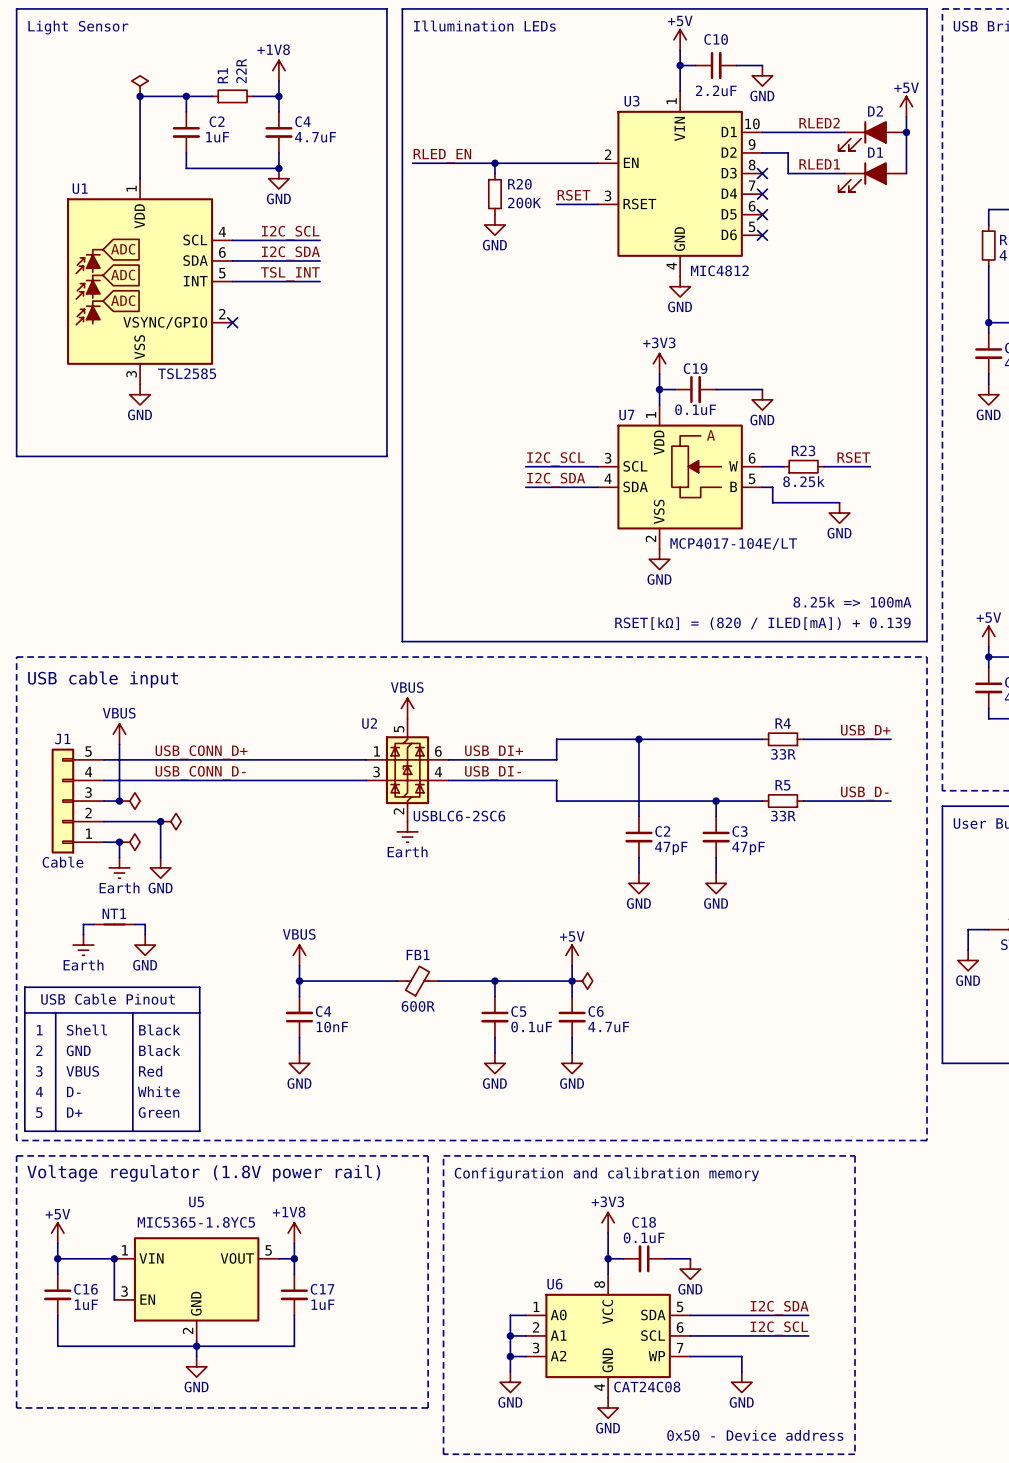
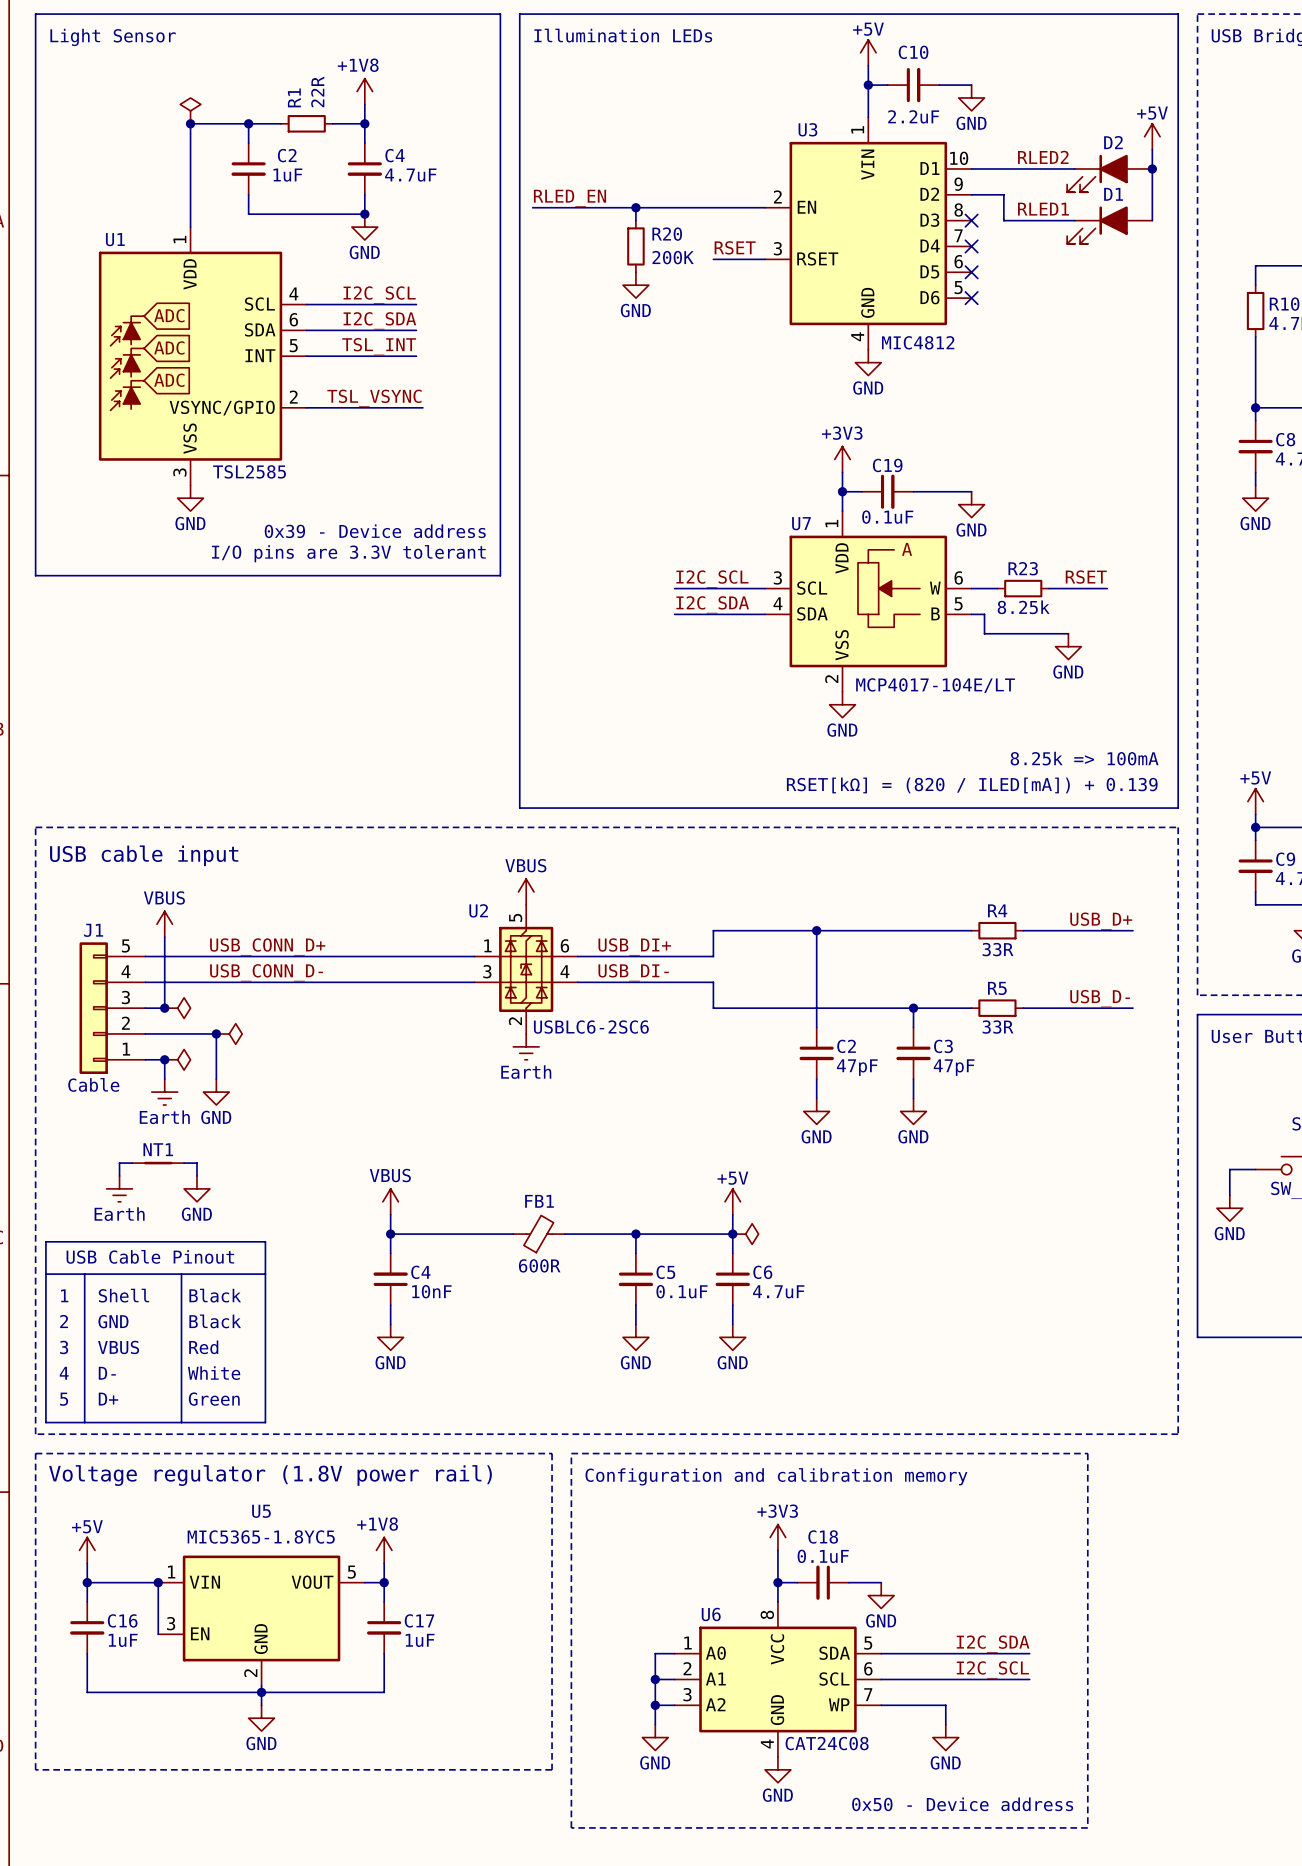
label: none -> TSL_VSYNC (374, 398)
wire: none -> (306, 407) (422, 407)
no-connect mark: (232, 322) -> none
text: none -> 0x39 - Device address (375, 531)
text: none -> I/O pins are 3.3V tolerant (348, 553)

